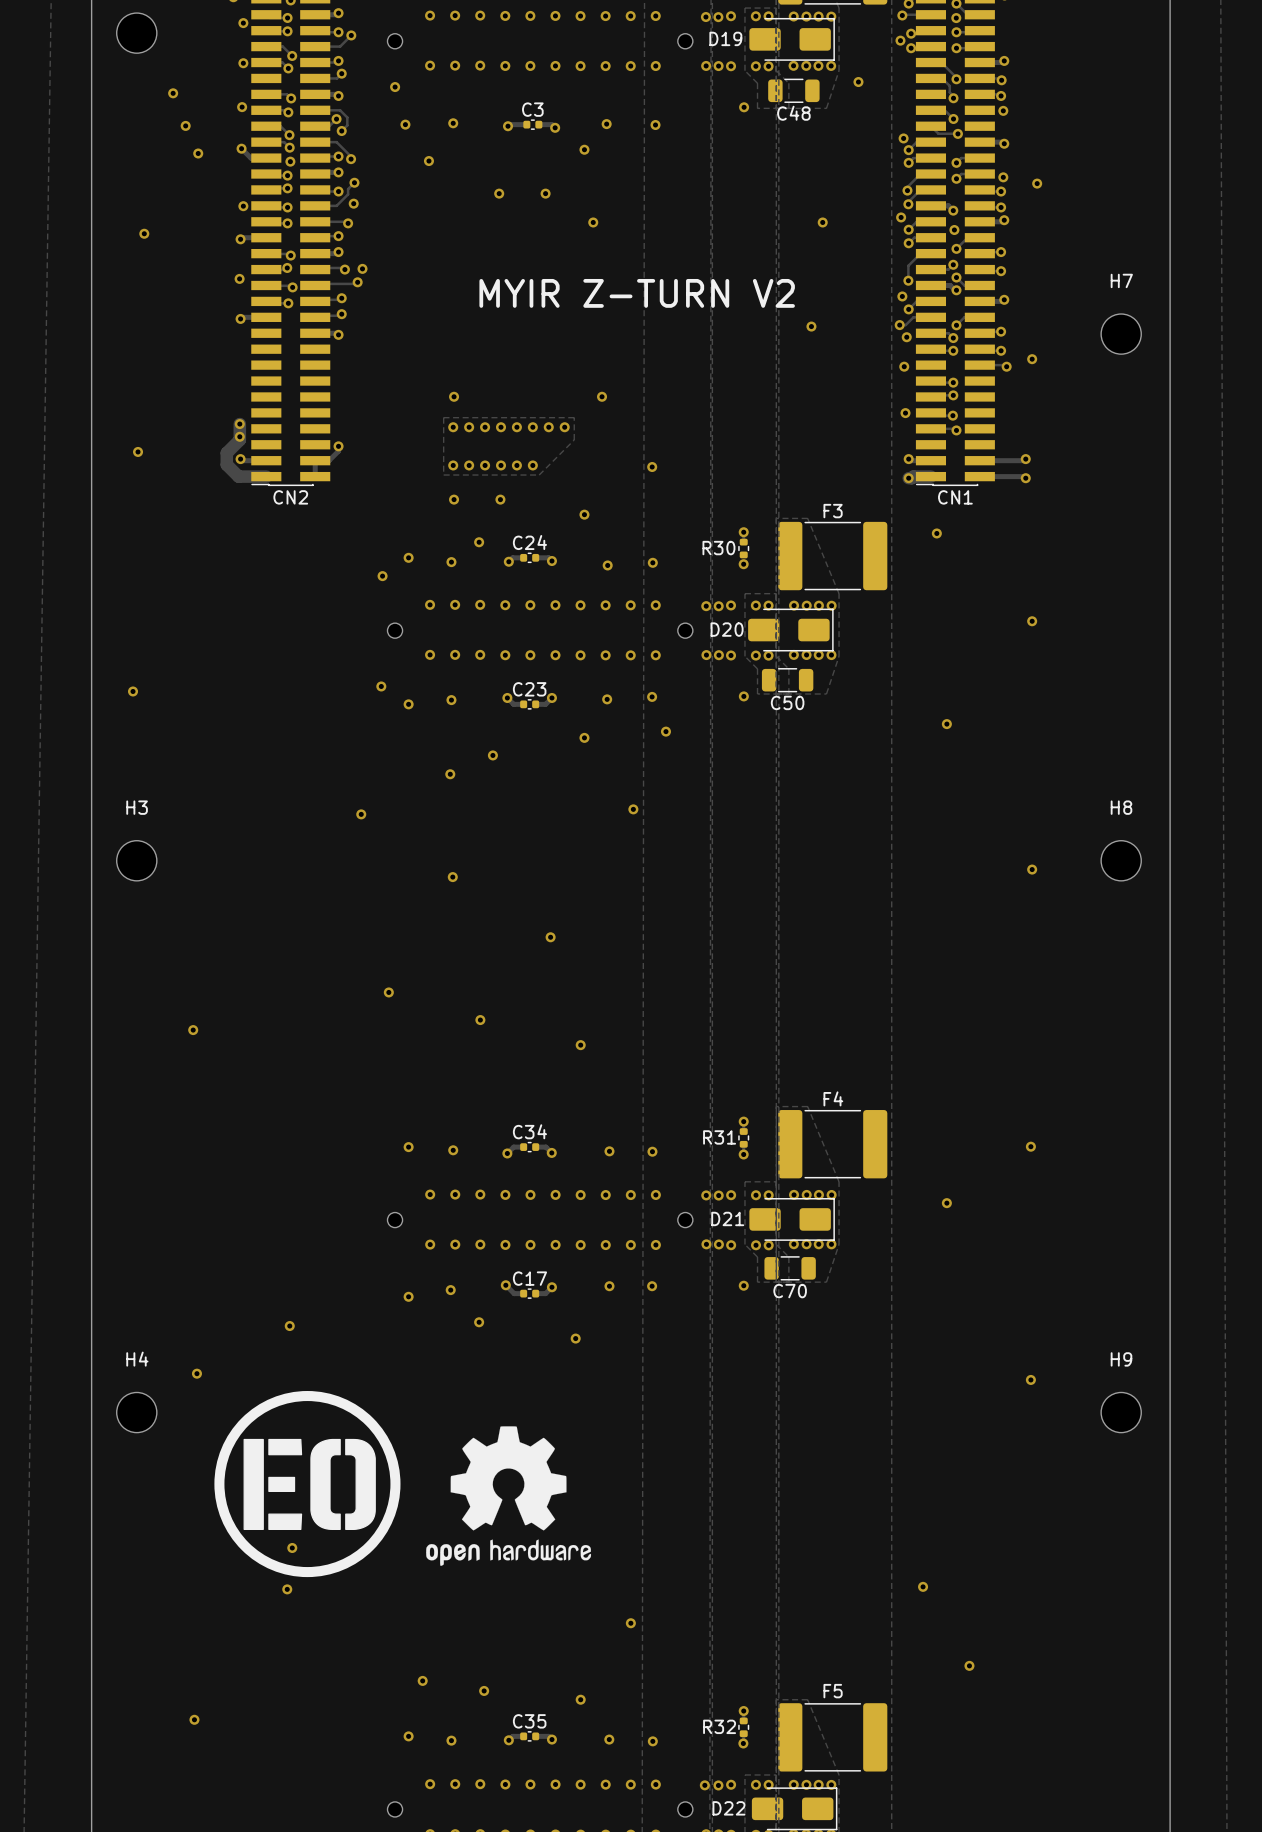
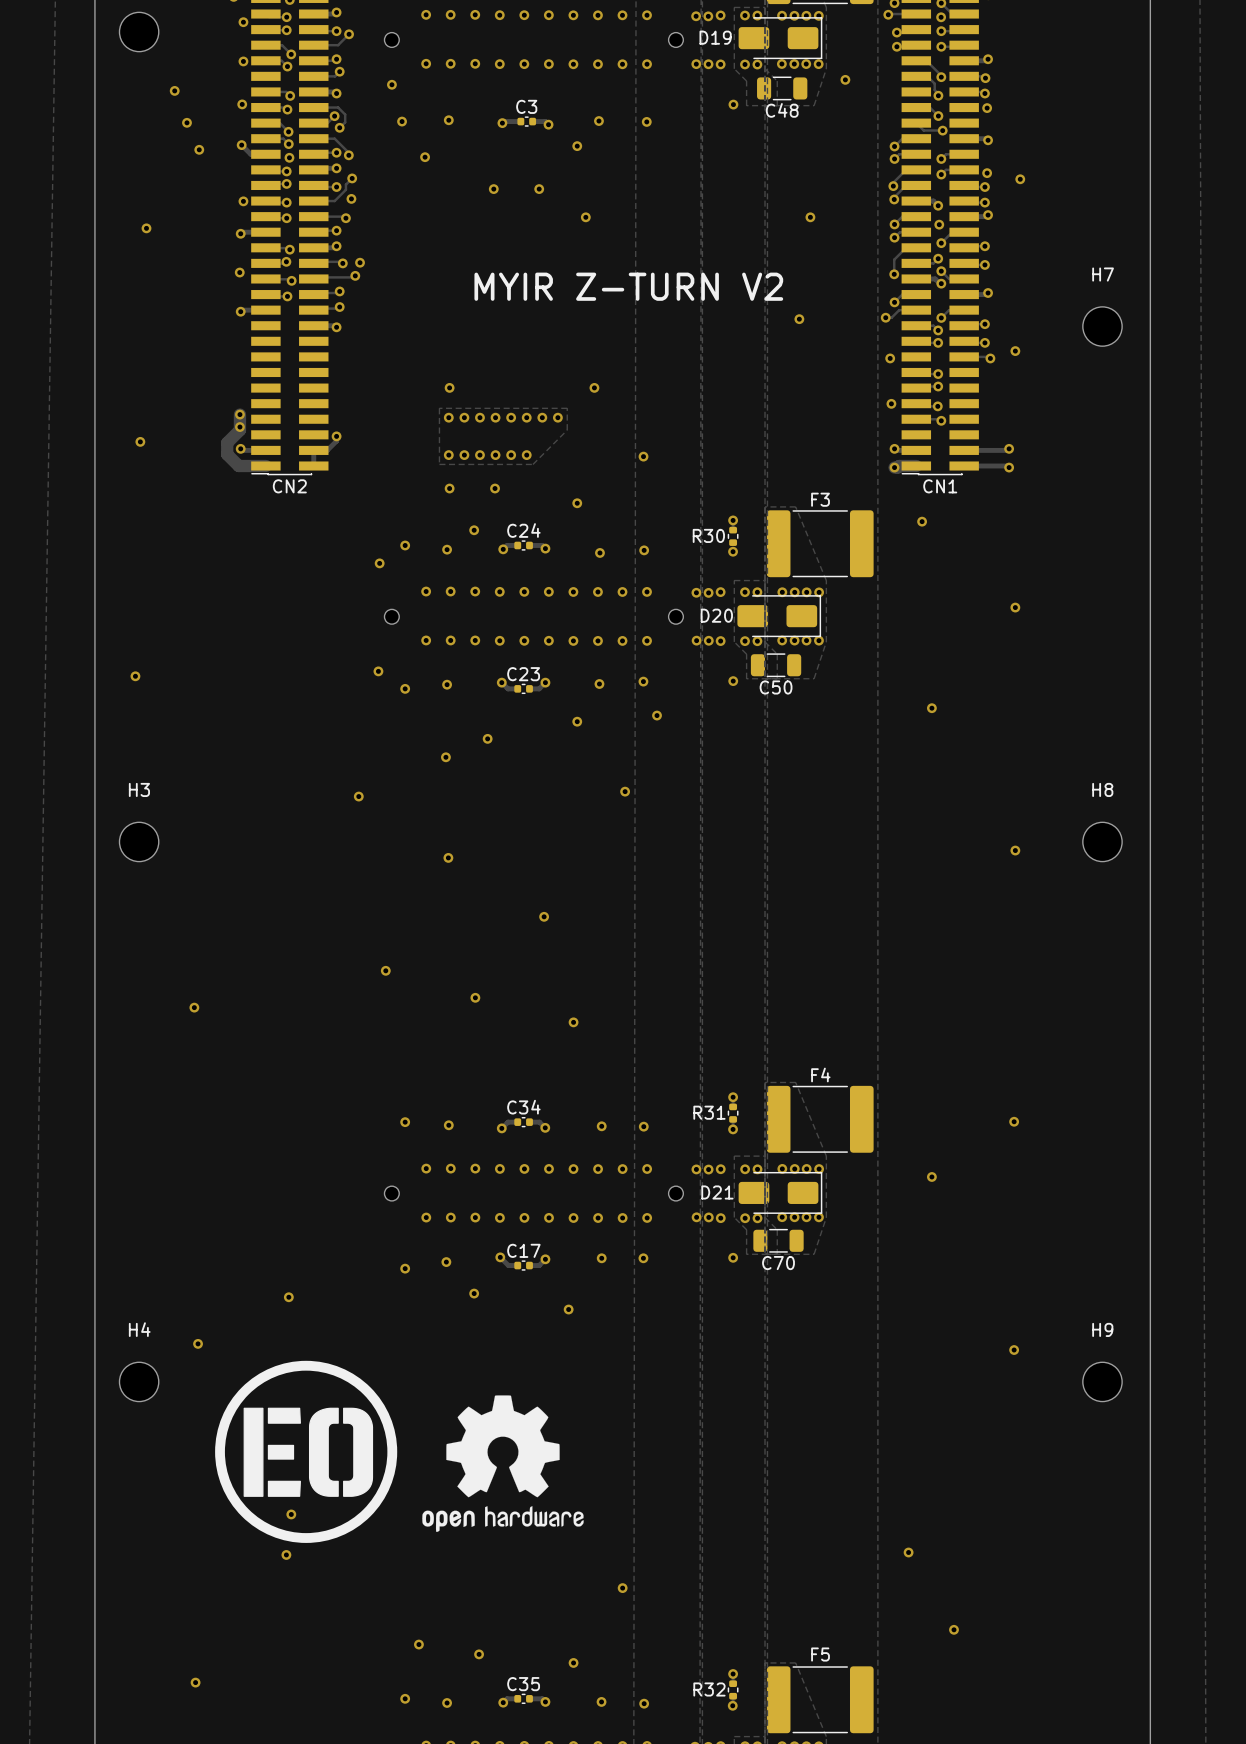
via: (900, 40) -> none
via: (903, 138) -> none
via: (901, 217) -> none
via: (902, 296) -> none
via: (906, 337) -> none

